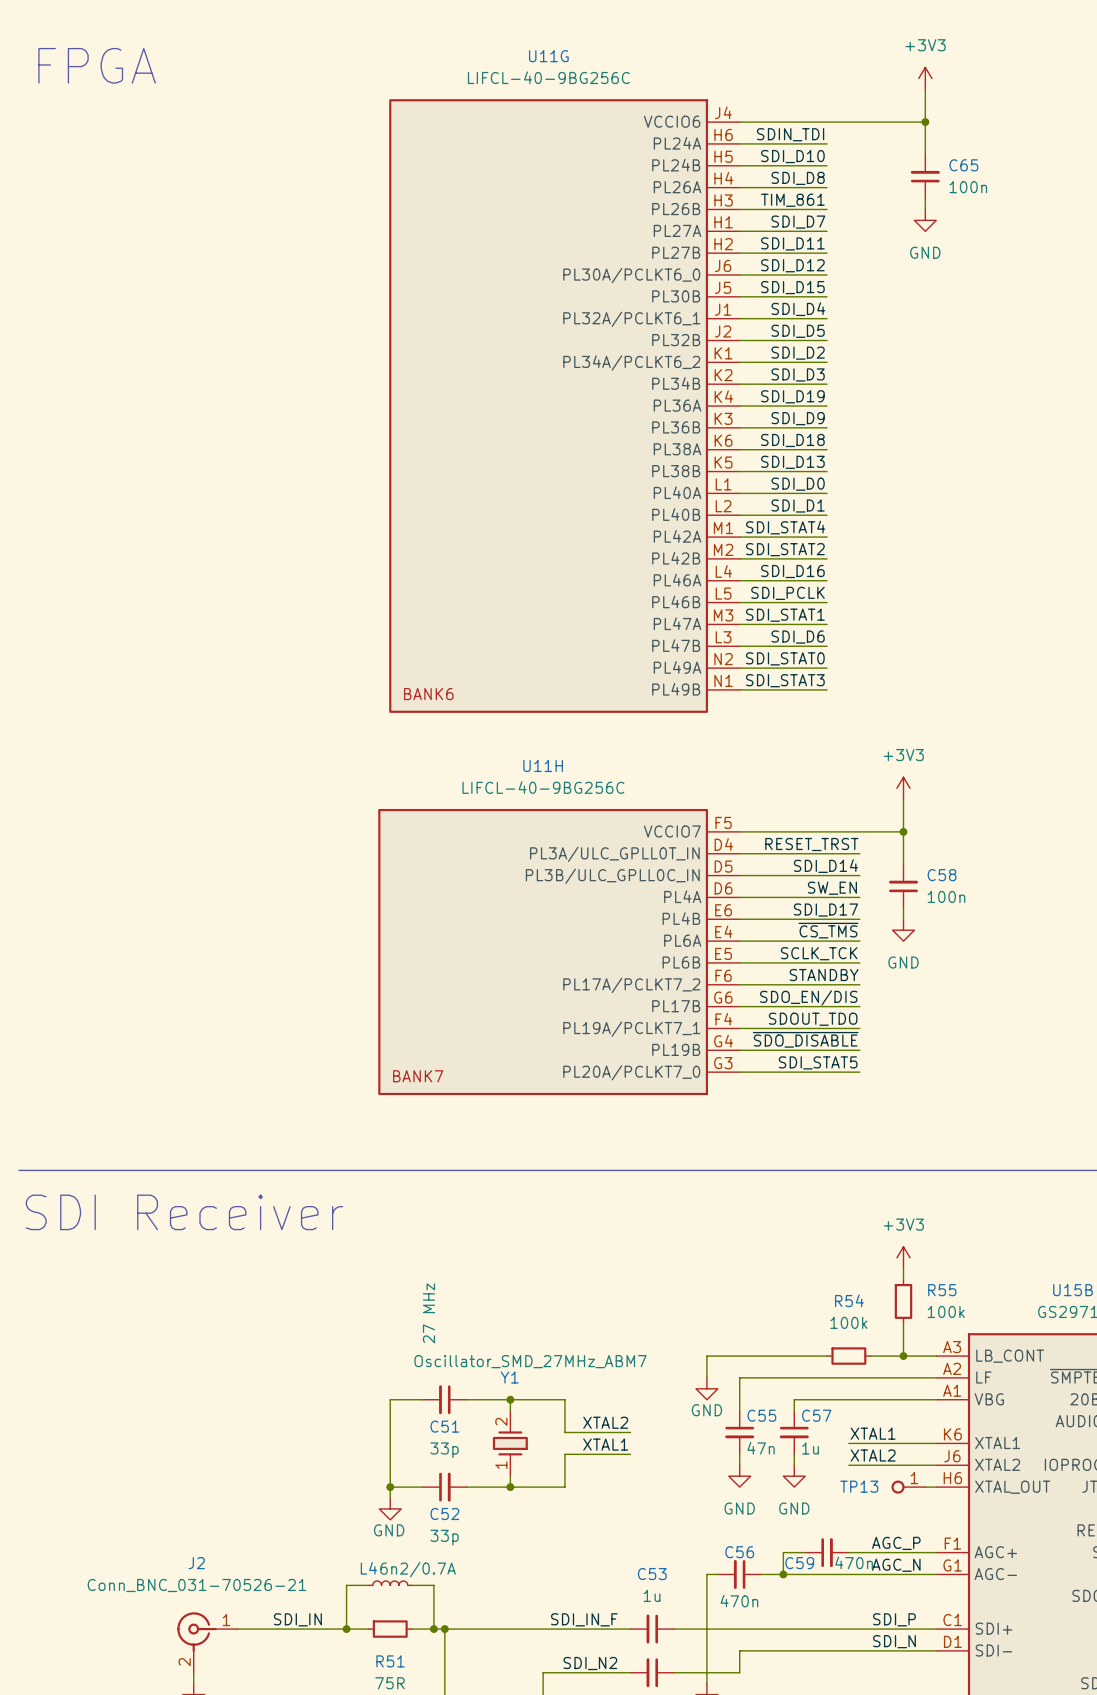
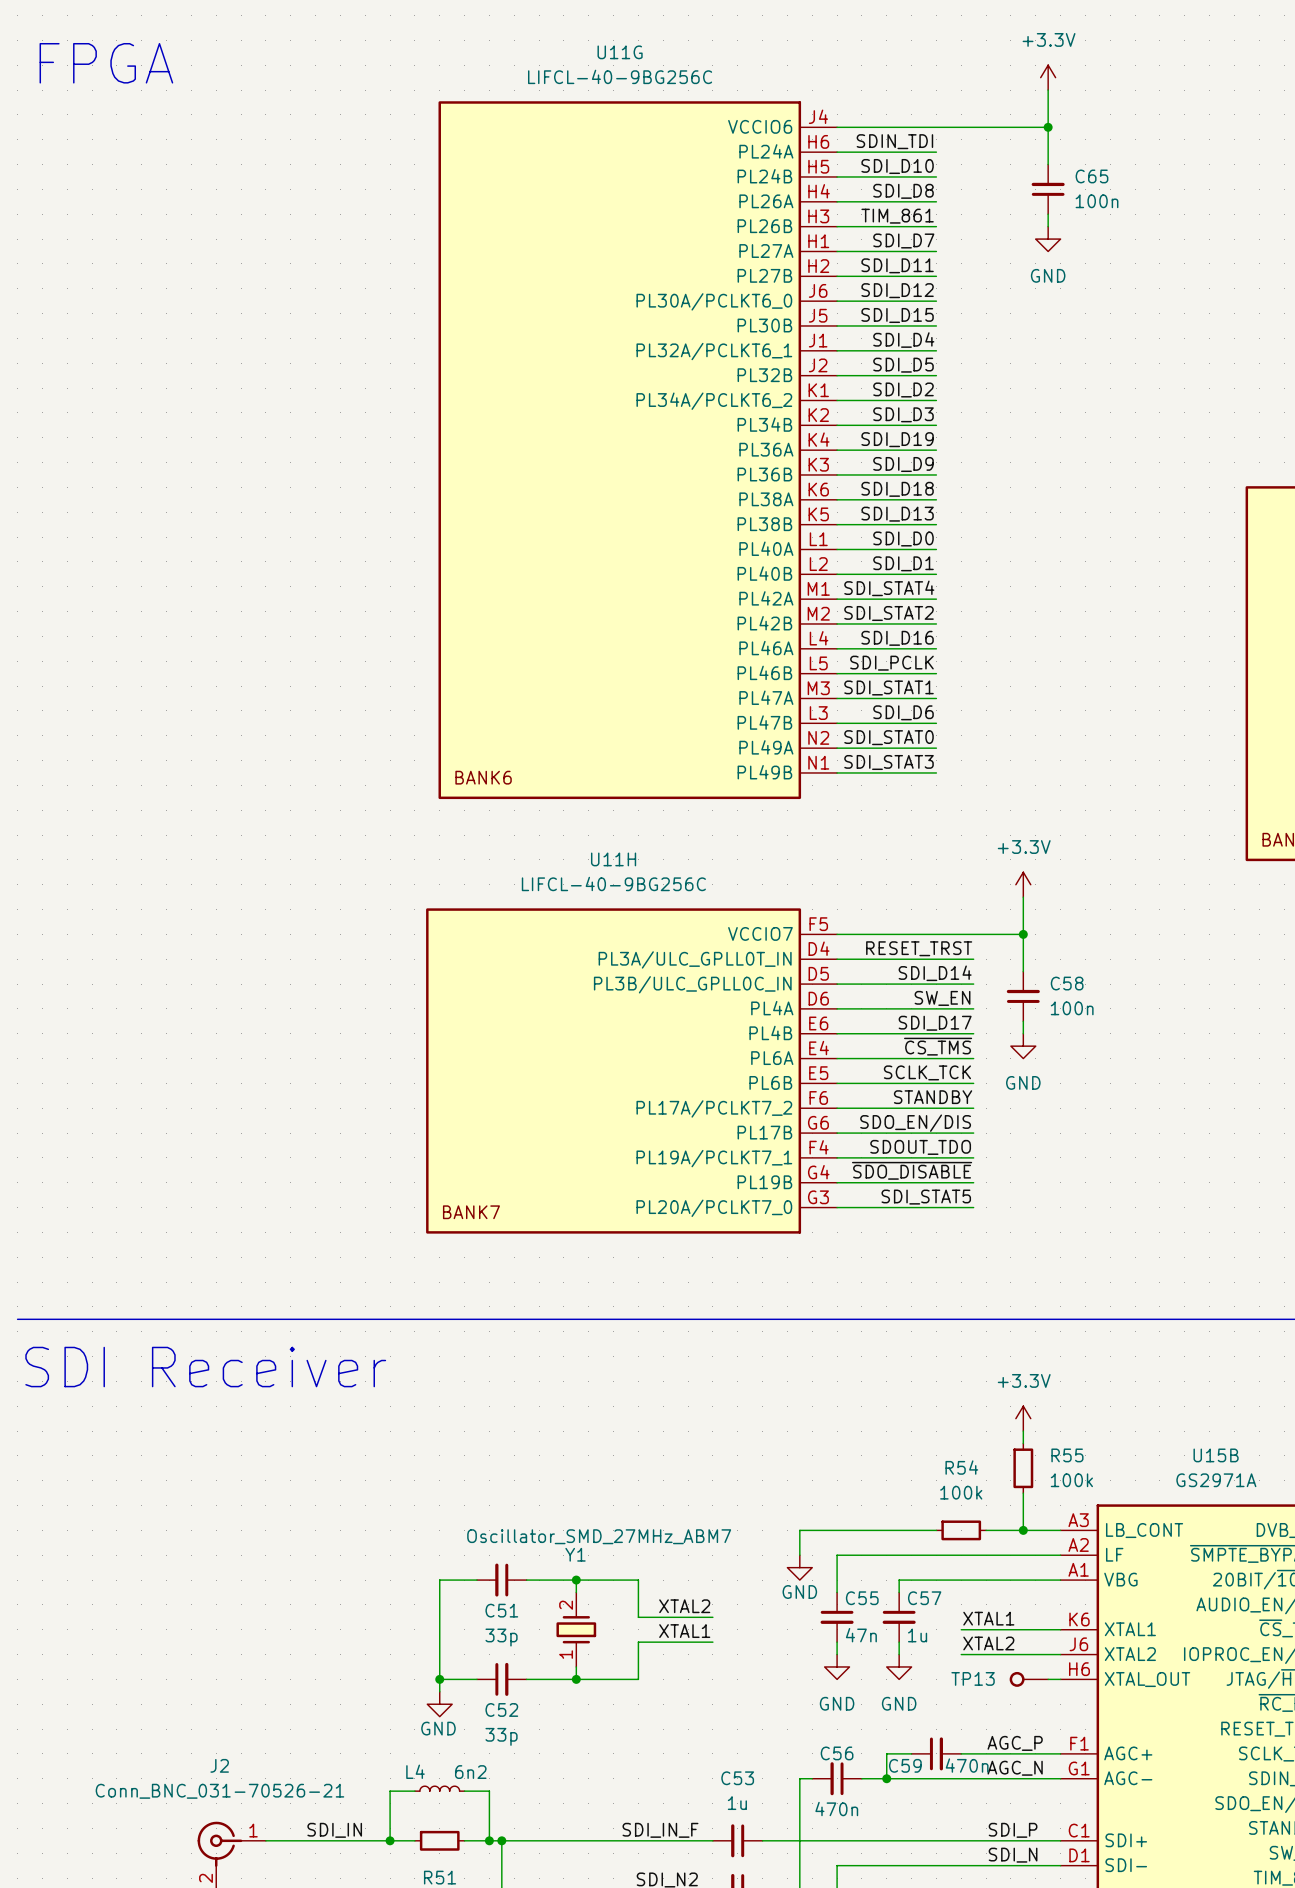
power symbol: +3V3 (925, 78) -> +3.3V (1048, 77)
power symbol: +3V3 (903, 788) -> +3.3V (1023, 884)
power symbol: +3V3 (903, 1257) -> +3.3V (1023, 1418)
Y1 text: 27 MHz (428, 1313) -> none
TP13 pin number: 1 (914, 1478) -> none
L4 text: 6n2/0.7A (418, 1569) -> 6n2 (470, 1772)

